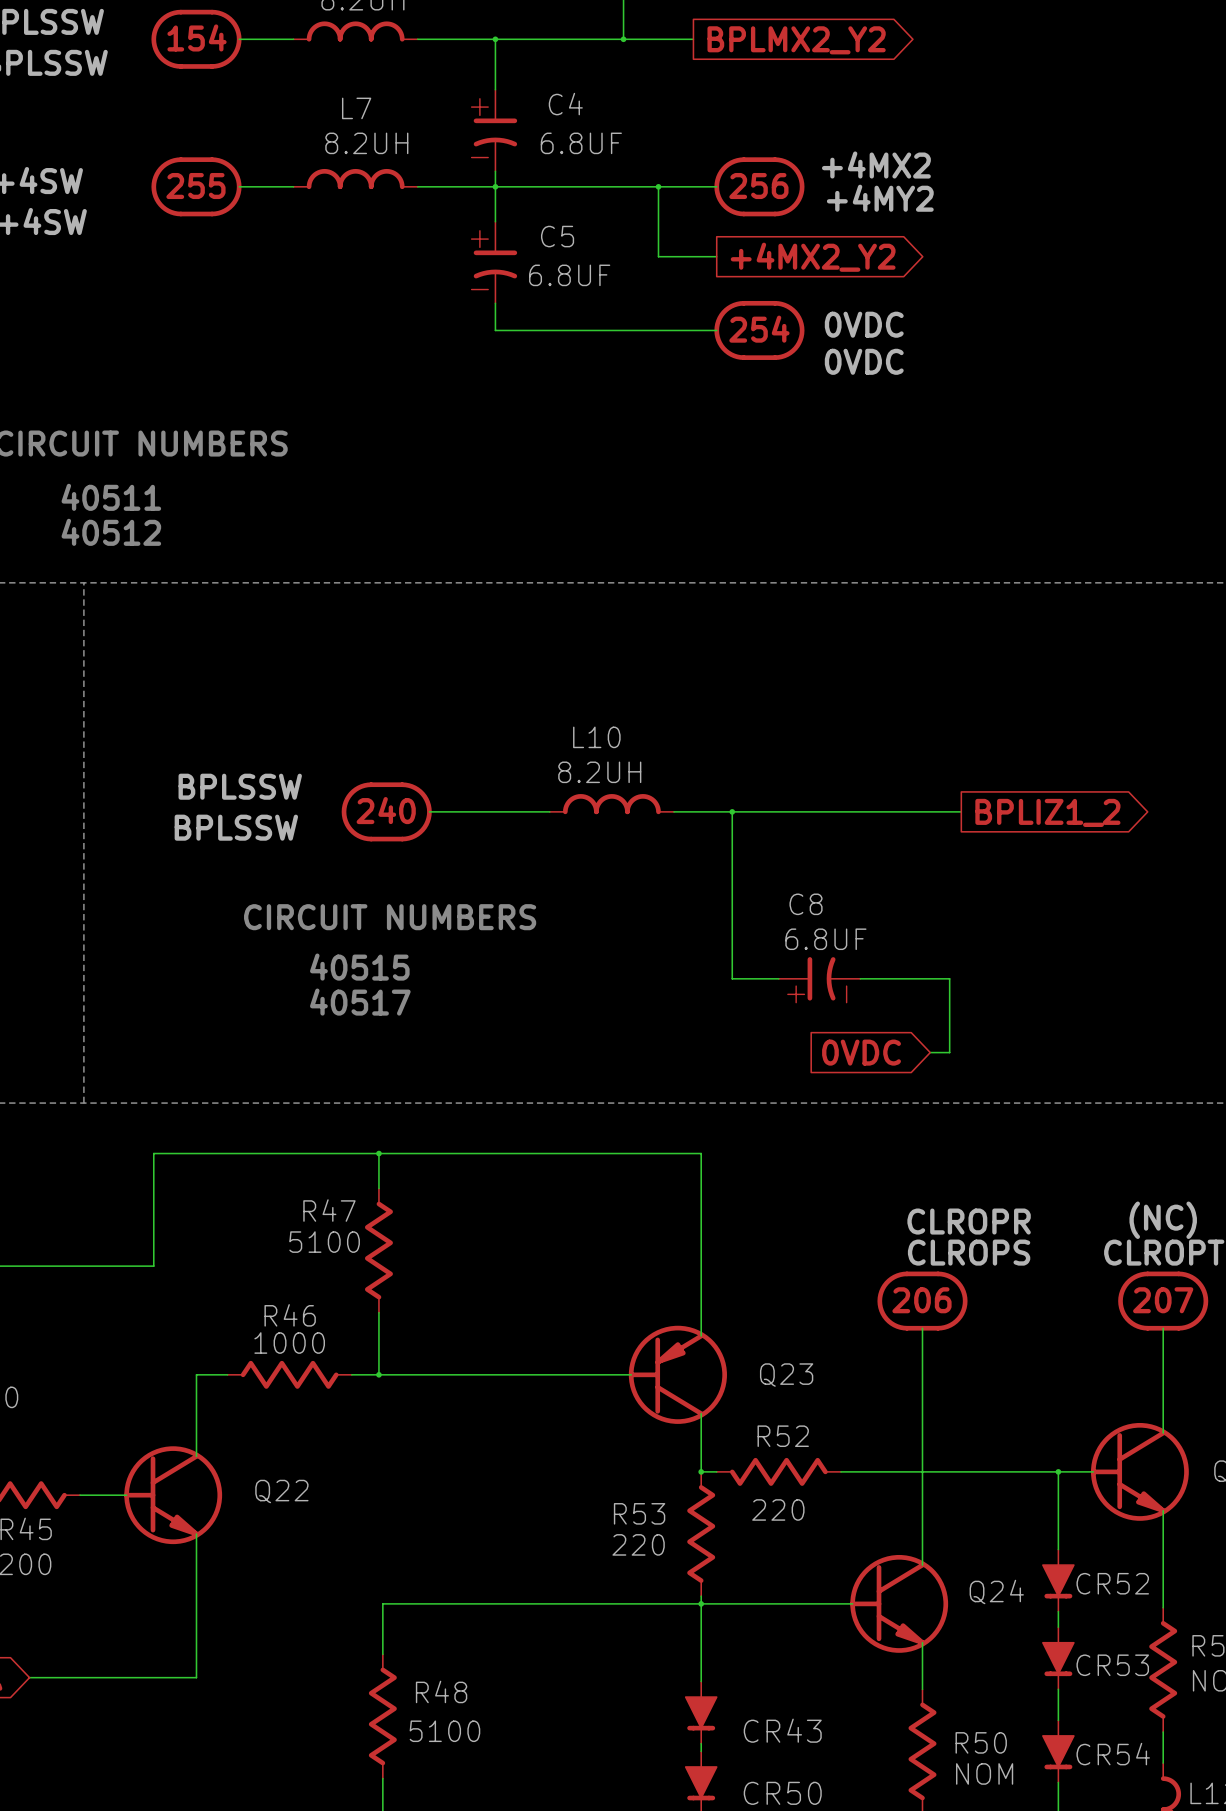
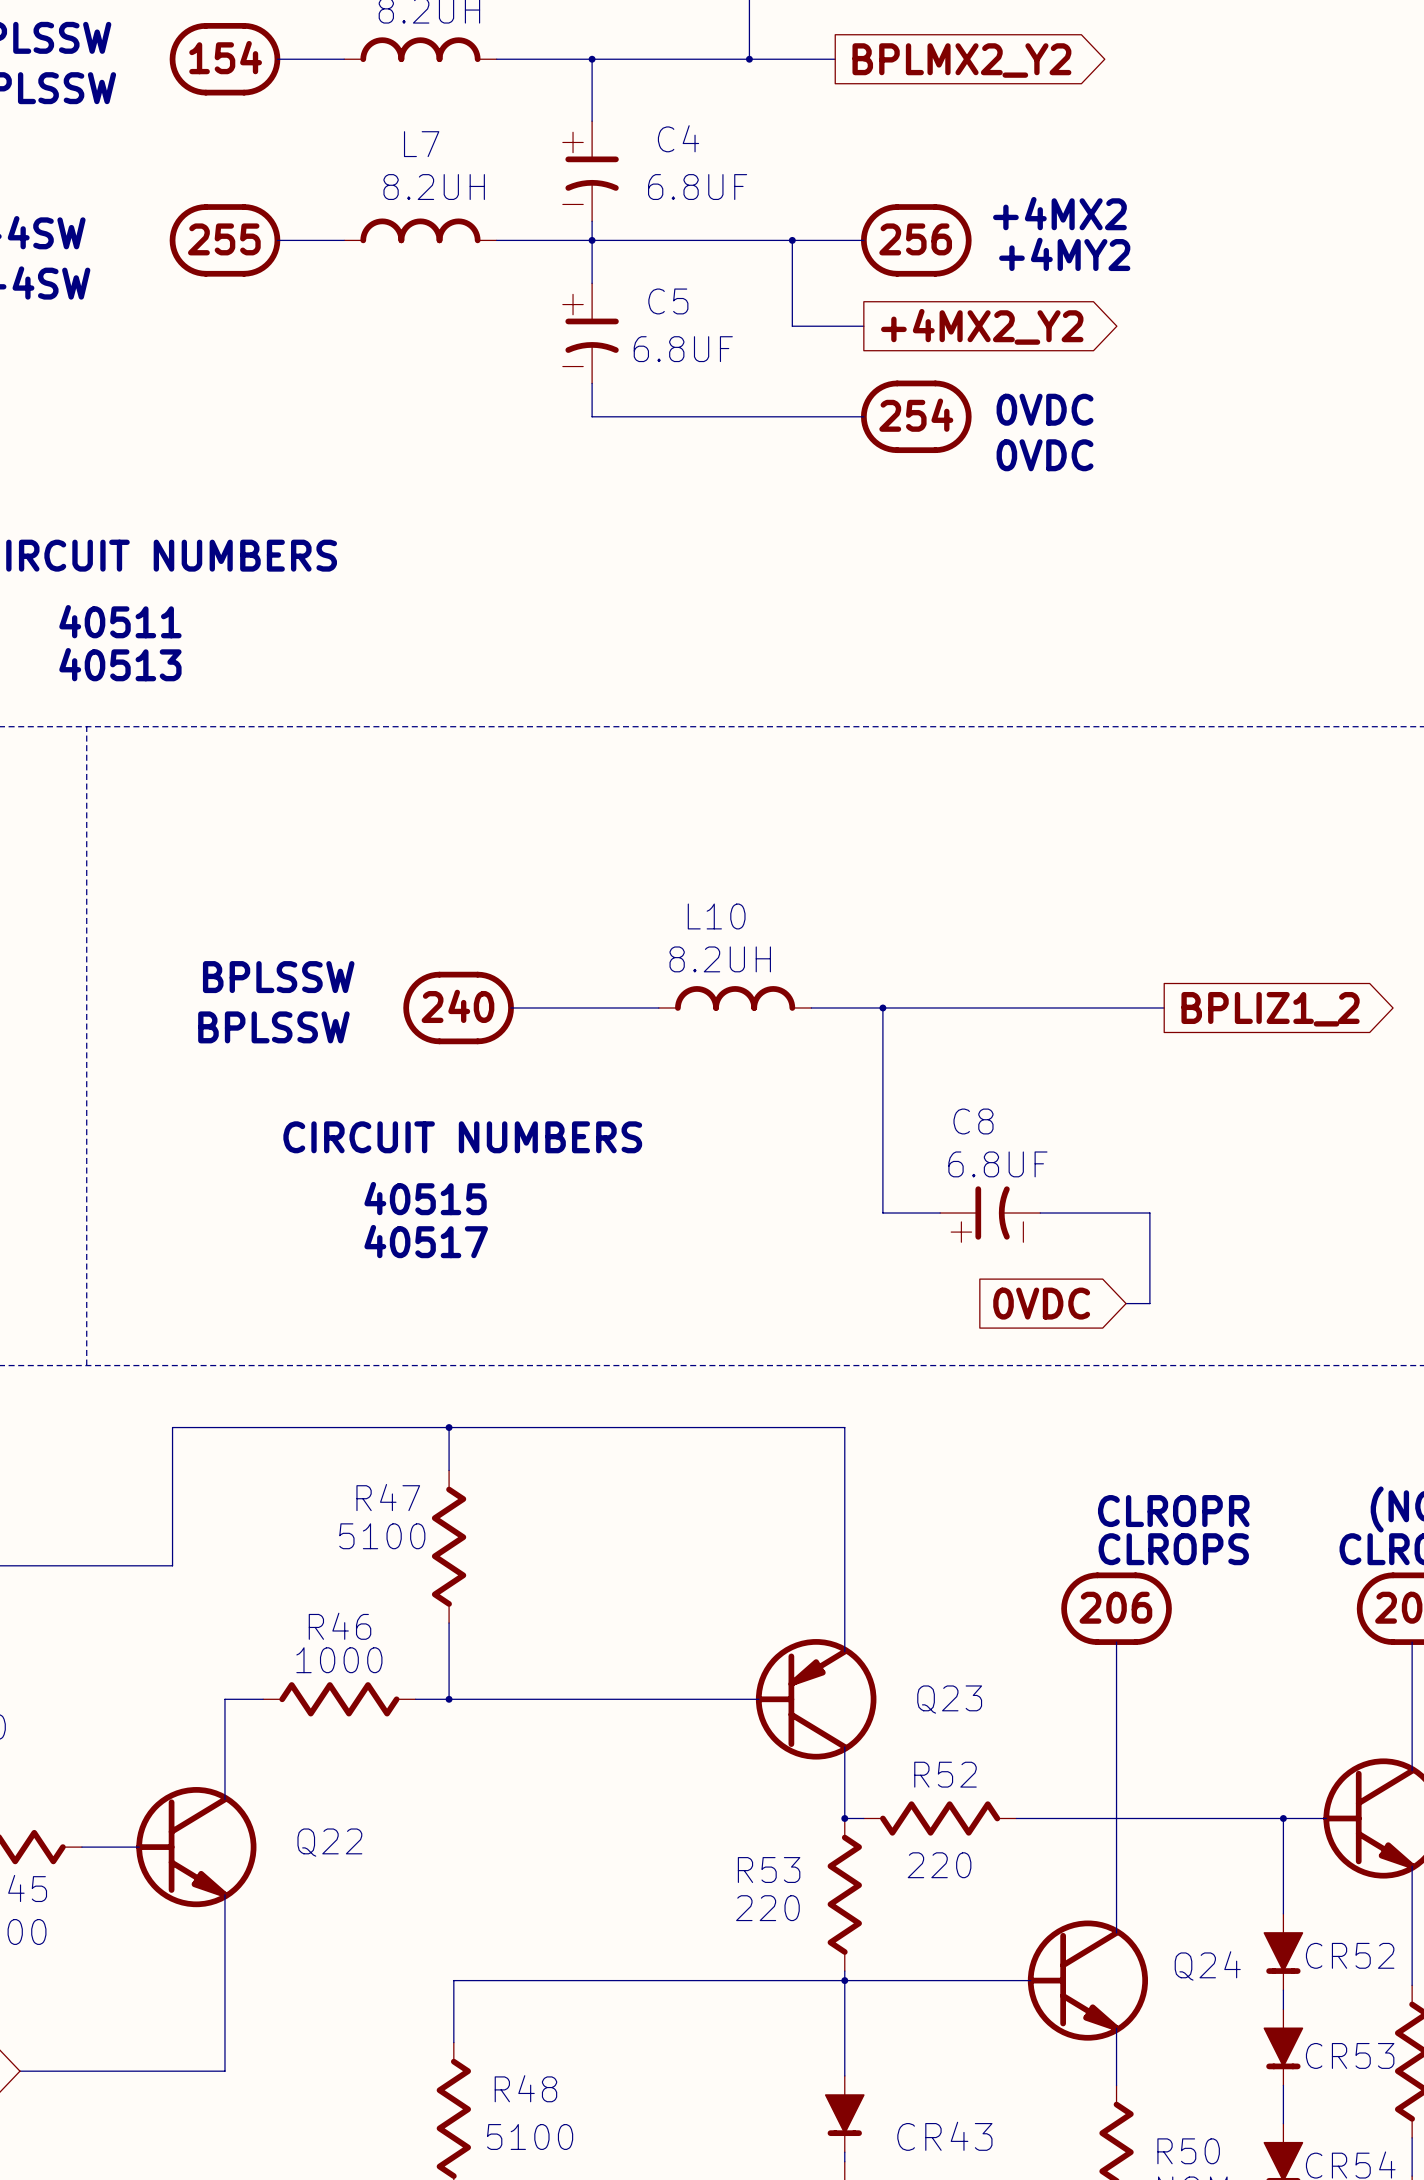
text: 40512 (111, 532) -> 40513 (120, 664)

